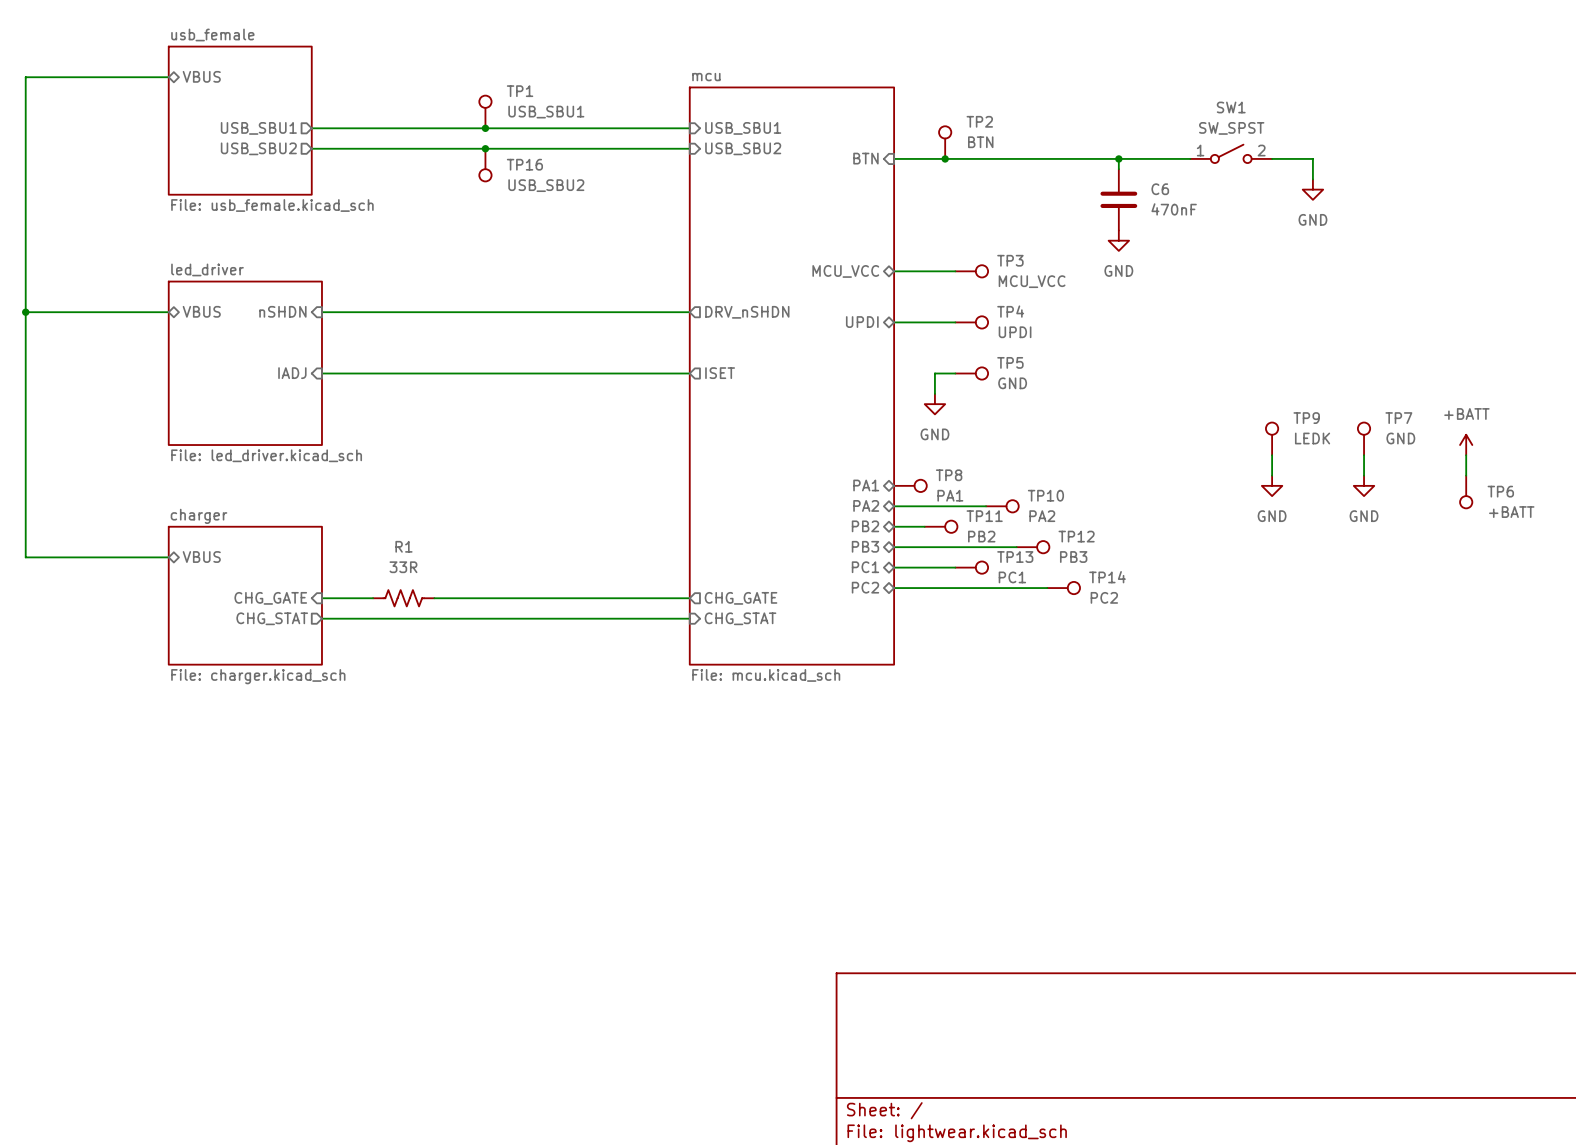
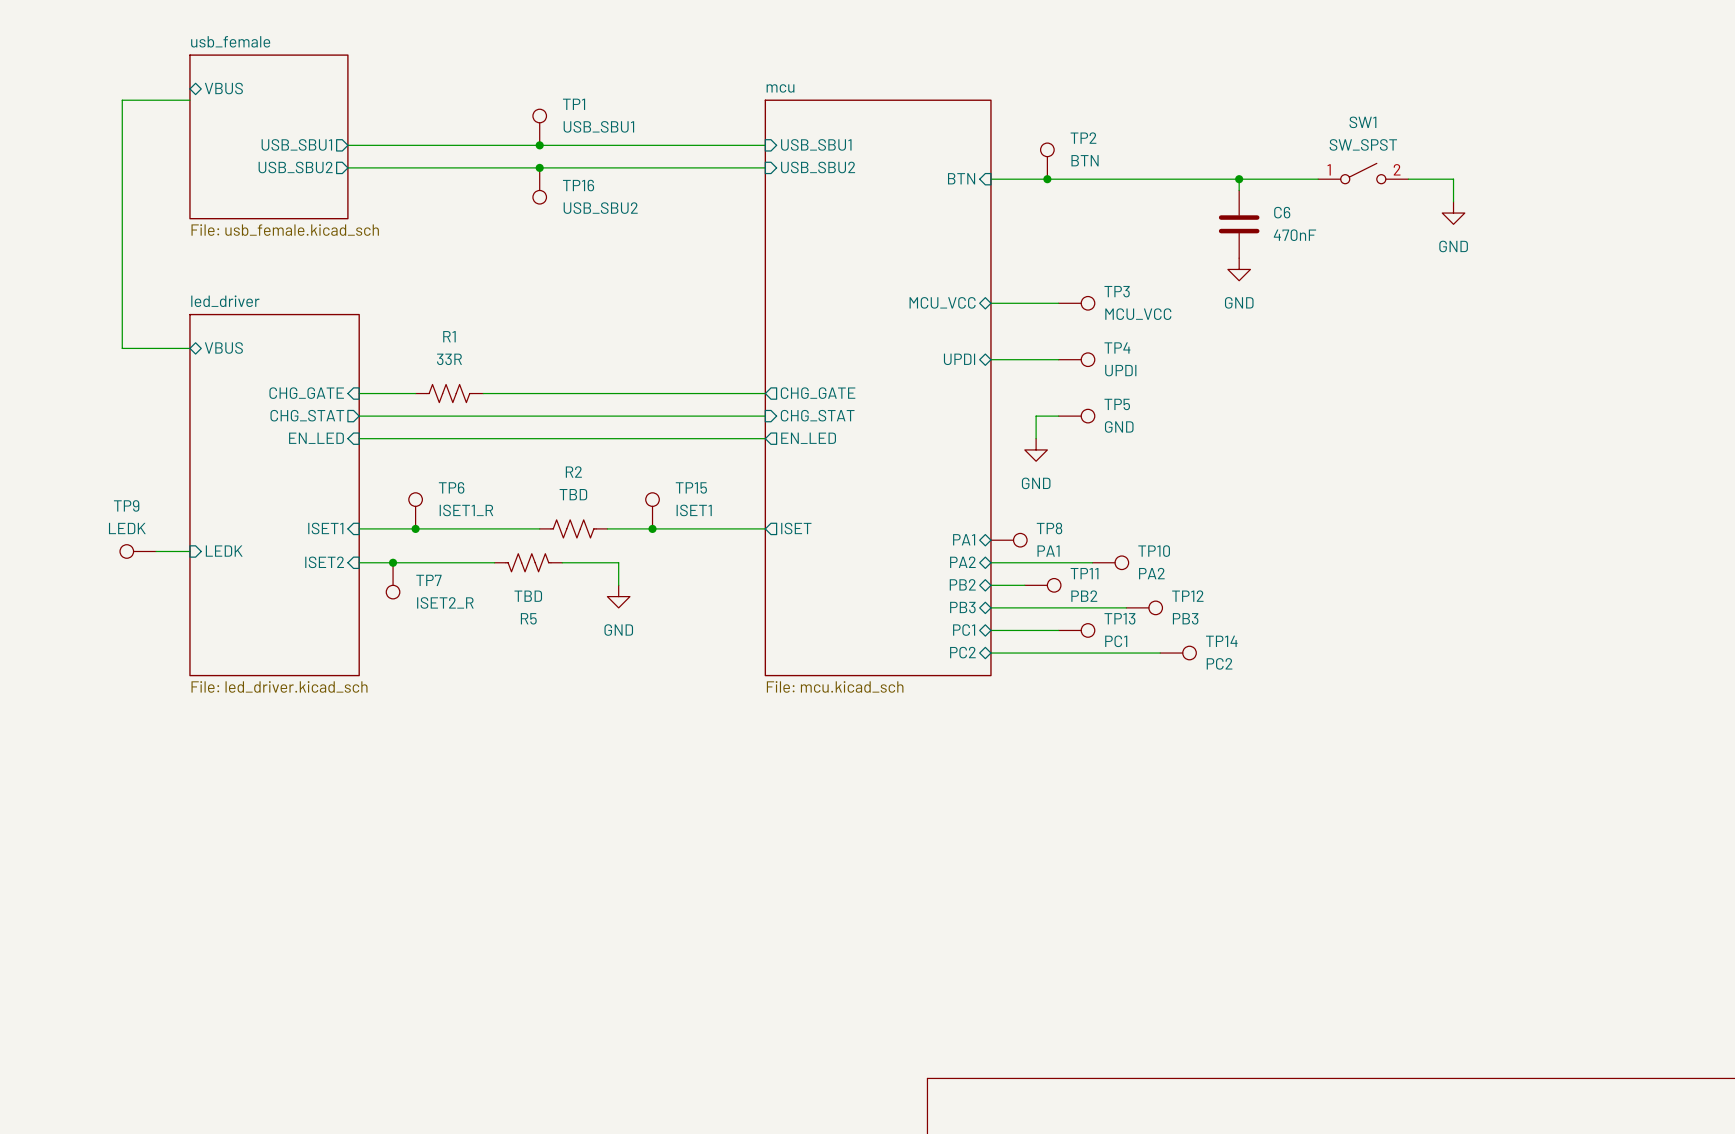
wire: (168, 77) (25, 77) (25, 557) (168, 557) -> none
sheet pin: nSHDN (282, 311) -> none
wire: (25, 312) (107, 312) -> (189, 100) (122, 100) (122, 348)
junction: (25, 312) -> none
wire: (321, 312) (689, 312) -> (359, 438) (765, 438)
sheet pin: DRV_nSHDN (747, 312) -> none
sheet mcu: none -> File: mcu.kicad_sch (878, 387)
sheet pin: none -> CHG_GATE (306, 393)
wire: none -> (359, 393) (415, 393)
wire: none -> (483, 393) (765, 393)
sheet pin: none -> CHG_GATE (818, 393)
sheet led_driver: File: led_driver.kicad_sch (245, 363) -> none
sheet pin shape: input (292, 373) -> output (307, 415)
sheet pin: IADJ (292, 373) -> CHG_STAT (307, 415)
sheet pin shape: output (720, 373) -> input (817, 415)
sheet pin: ISET (720, 373) -> CHG_STAT (817, 415)
sheet mcu: File: mcu.kicad_sch (791, 376) -> none
sheet pin: none -> EN_LED (316, 438)
sheet pin: none -> EN_LED (808, 438)
TP7 name position: TP7 (1398, 418) -> TP7 (428, 580)
TP9 rotation: 0° (1272, 428) -> 90° counterclockwise (126, 551)
TP7 rotation: 0° (1364, 428) -> 180° (393, 592)
TP9 position: (1272, 438) -> (138, 551)
TP9 value position: LEDK (1312, 438) -> LEDK (127, 528)
TP7 position: (1364, 438) -> (393, 580)
TP7 value: GND (1400, 438) -> ISET2_R (445, 602)
sheet led_driver: none -> File: led_driver.kicad_sch (274, 495)
power symbol: +BATT (1466, 445) -> none
wire: (1272, 455) (1272, 475) -> none
wire: (1364, 455) (1364, 475) -> none
wire: (1466, 455) (1466, 475) -> none
TP15: none -> ISET1 (652, 510)
sheet pin: none -> ISET1 (325, 528)
wire: none -> (359, 528) (539, 528)
junction: none -> (415, 528)
R2: none -> TBD (573, 528)
wire: none -> (607, 528) (765, 528)
junction: none -> (652, 528)
sheet pin: none -> ISET (796, 528)
power symbol: GND (1272, 485) -> none
power symbol: GND (1364, 485) -> none
TP6 name position: TP6 (1500, 491) -> TP6 (451, 487)
TP6 position: (1466, 492) -> (415, 510)
sheet pin: none -> LEDK (224, 551)
wire: none -> (156, 551) (189, 551)
TP6 rotation: 0° (1466, 502) -> 180° (415, 499)
sheet pin: none -> ISET2 (324, 562)
wire: none -> (359, 562) (494, 562)
junction: none -> (393, 562)
R5: none -> TBD (528, 562)
wire: none -> (562, 562) (618, 562) (618, 585)
TP6 value: +BATT (1511, 512) -> ISET1_R (466, 510)
power symbol: none -> GND (618, 596)
sheet pin: VBUS (201, 557) -> none
sheet charger: File: charger.kicad_sch (245, 595) -> none
sheet pin: CHG_GATE (270, 598) -> none
wire: (321, 598) (373, 598) -> none
R1 position: (403, 598) -> (449, 393)
wire: (434, 598) (689, 598) -> none
sheet pin: CHG_GATE (741, 598) -> none
sheet pin: CHG_STAT (272, 618) -> none
wire: (321, 618) (689, 618) -> none
sheet pin: CHG_STAT (740, 618) -> none

